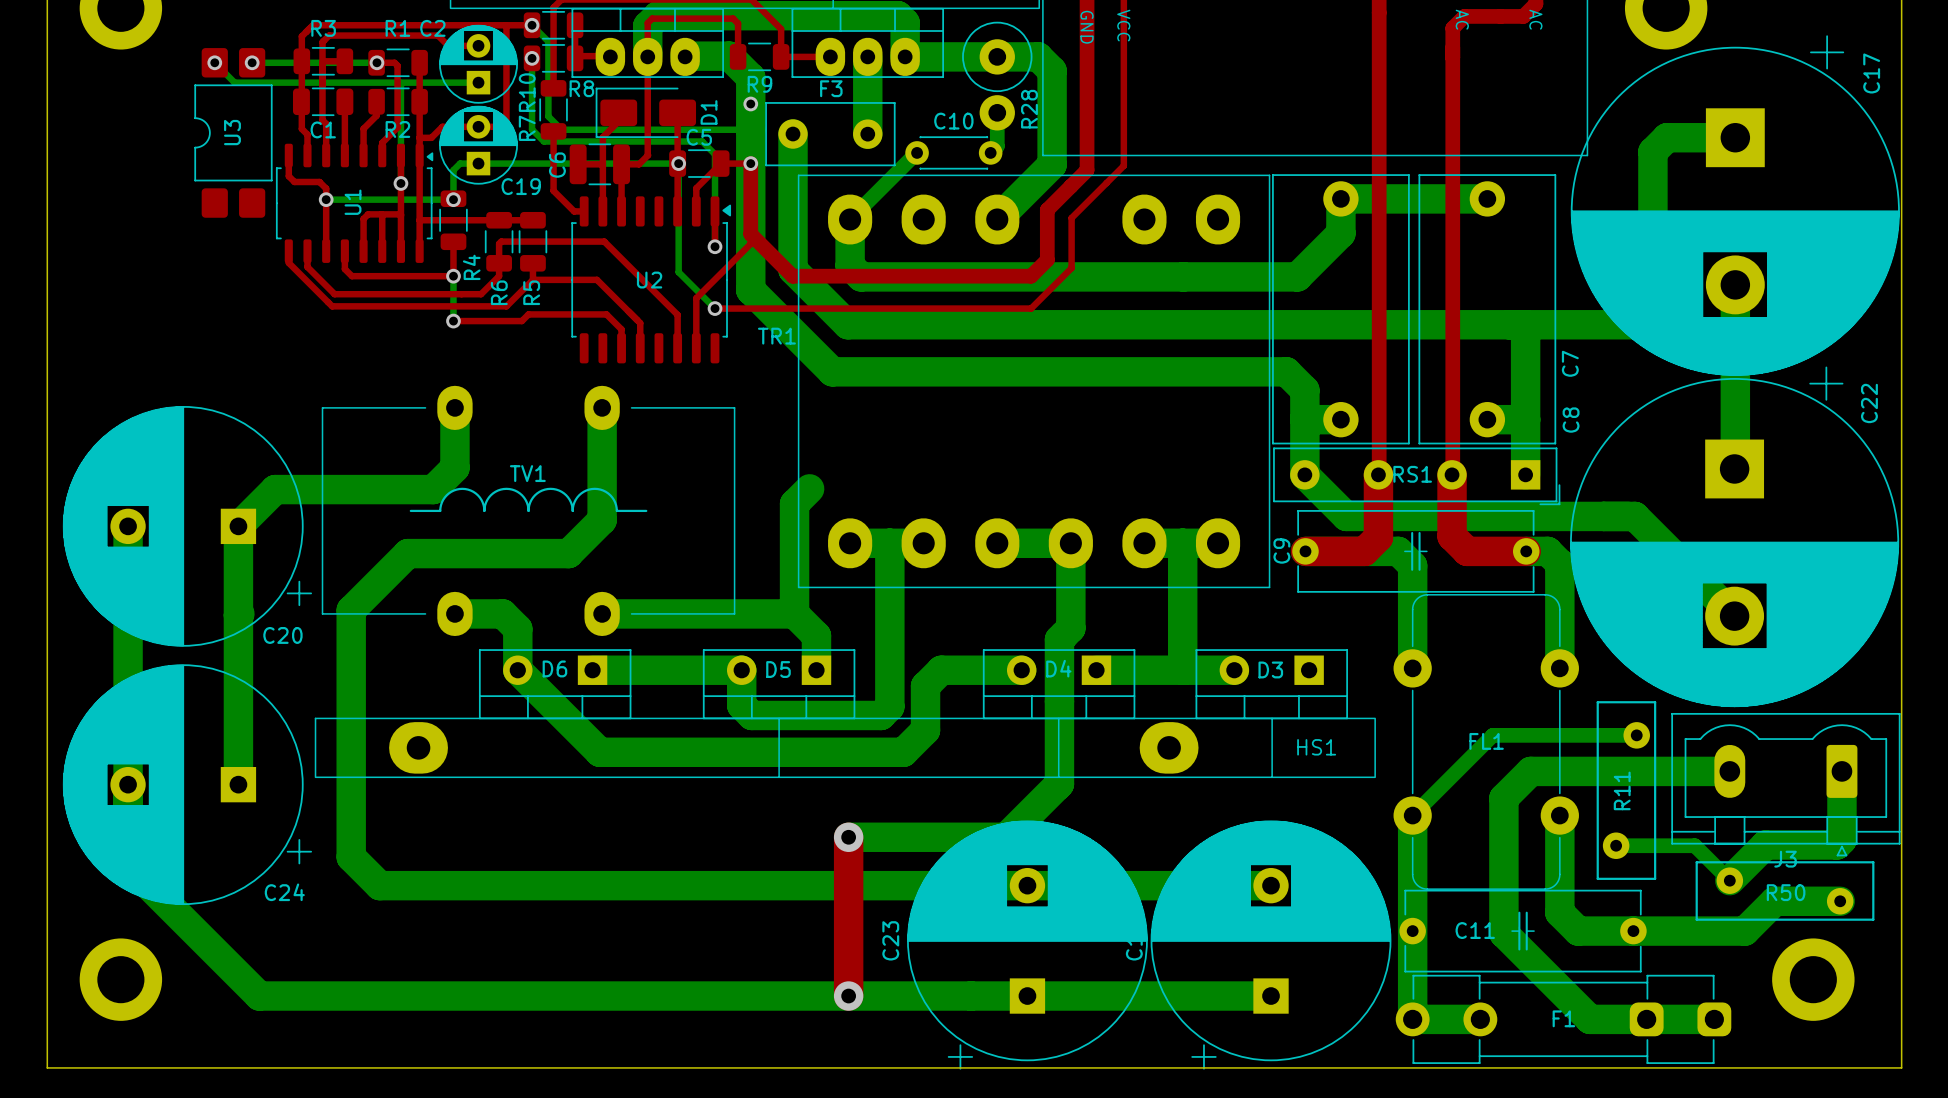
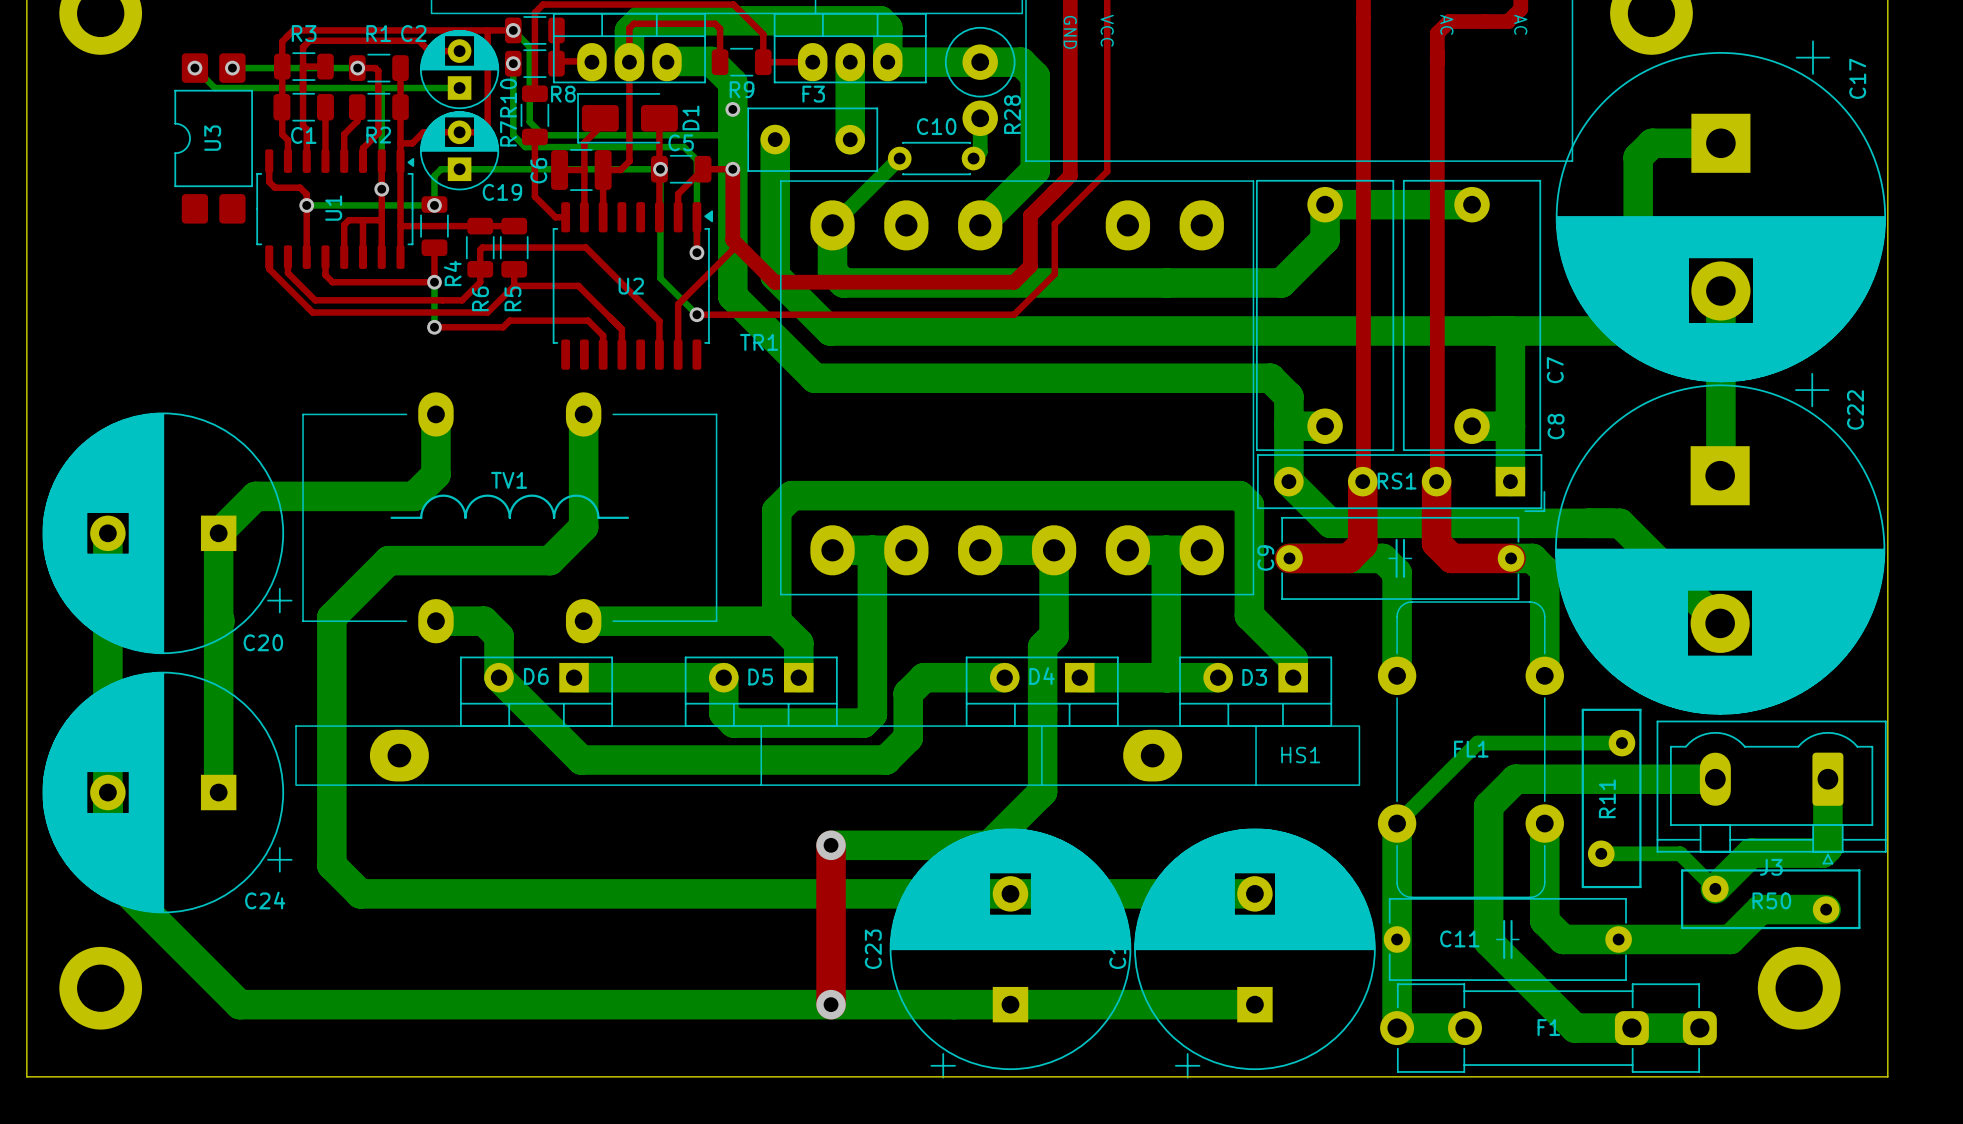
bottom track: none -> (791, 495) (1239, 495) (1249, 505) (1249, 615) (1293, 659) (1293, 677)

